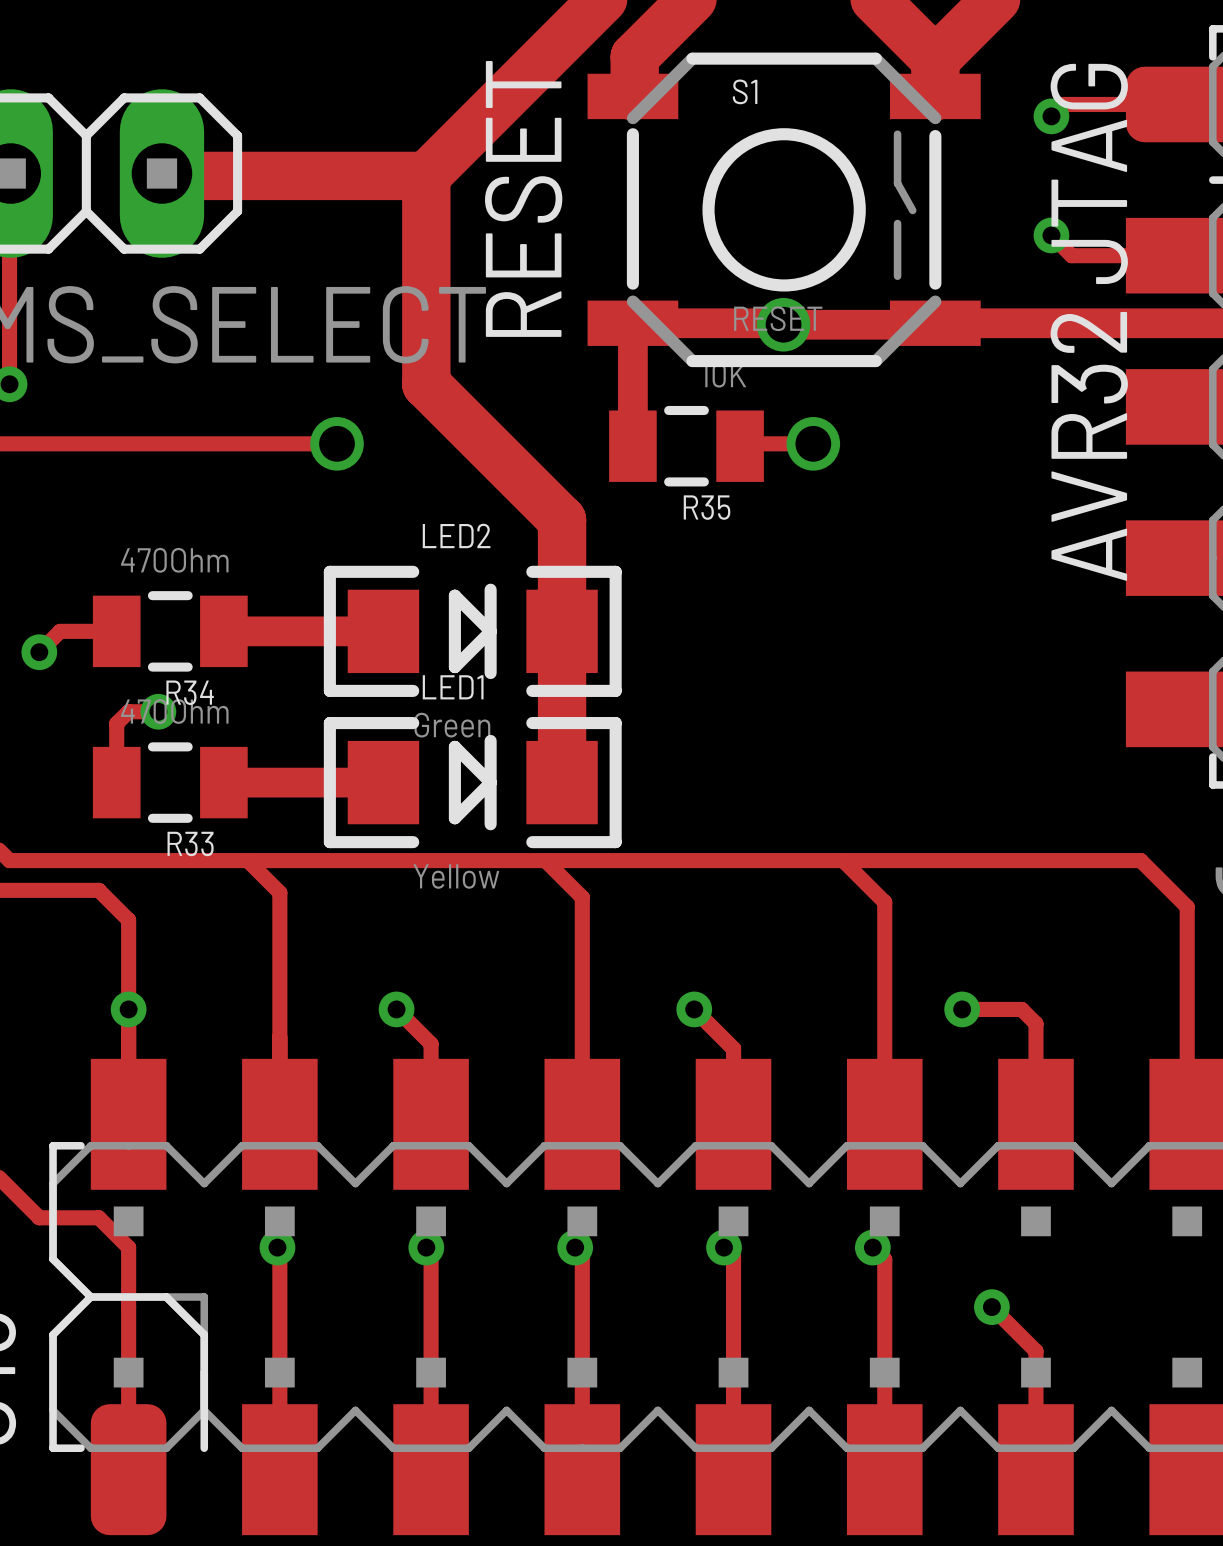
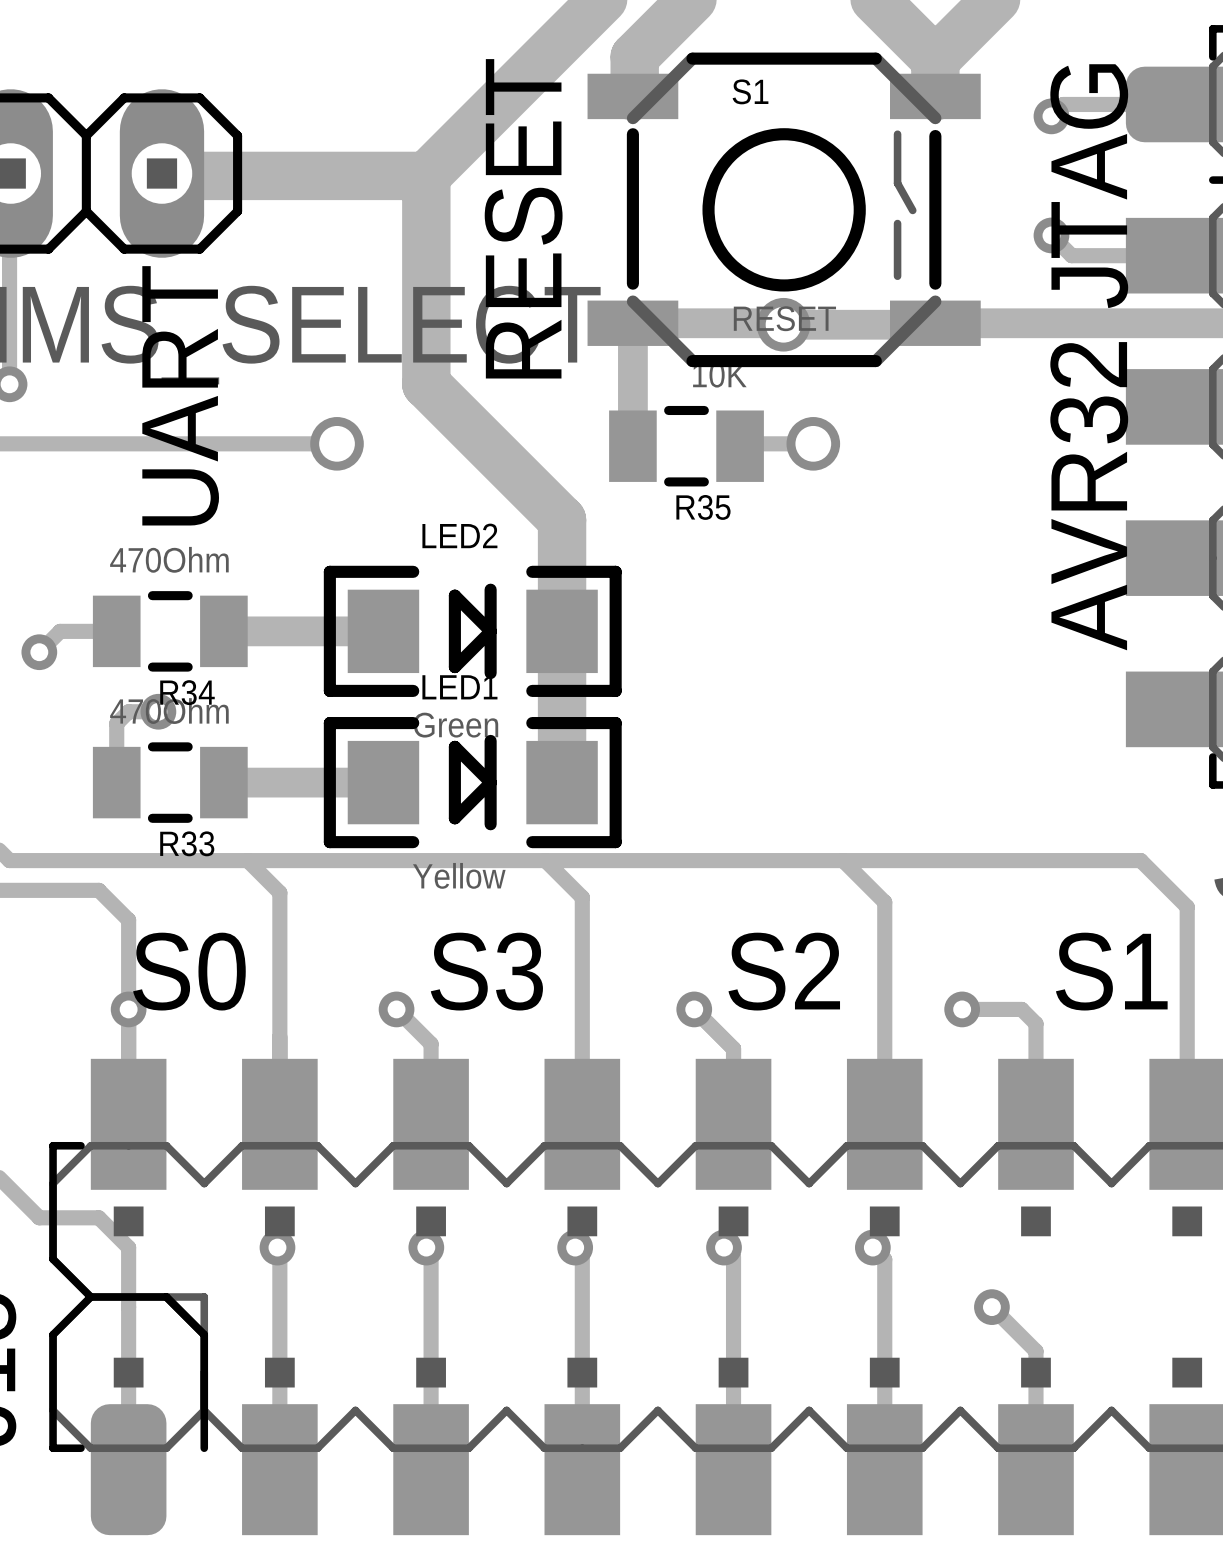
text: none -> UART (180, 395)
text: none -> S0 (189, 971)
text: none -> S3 (486, 971)
text: none -> S2 (784, 971)
text: none -> S1 (1111, 971)

